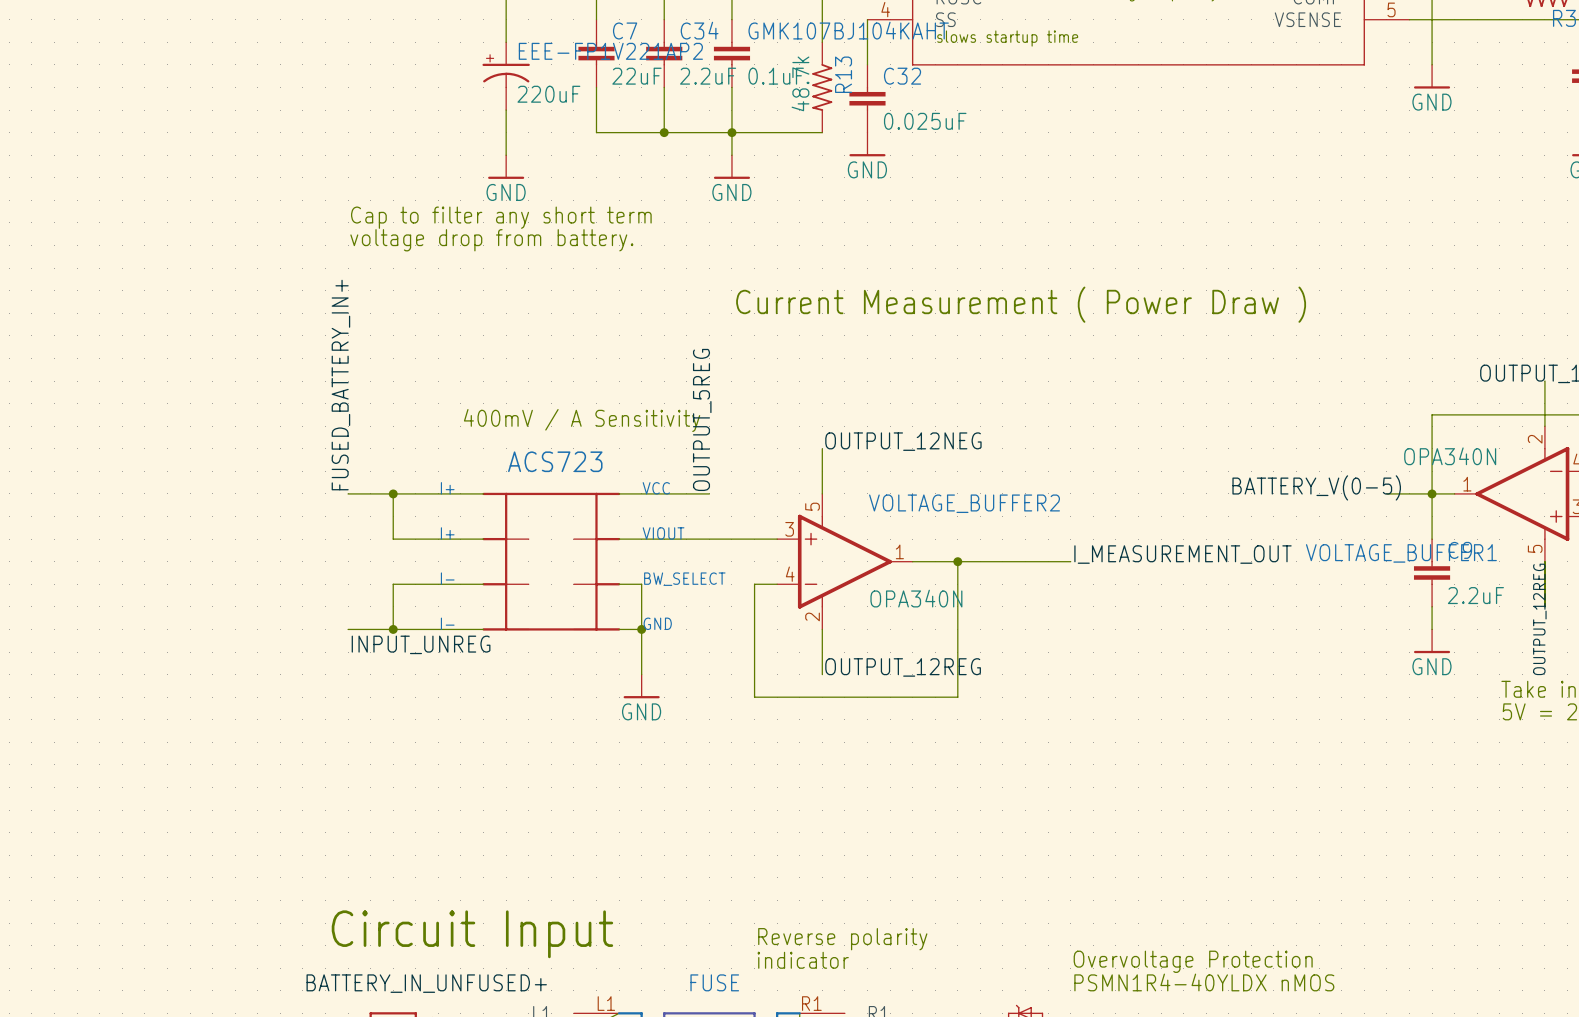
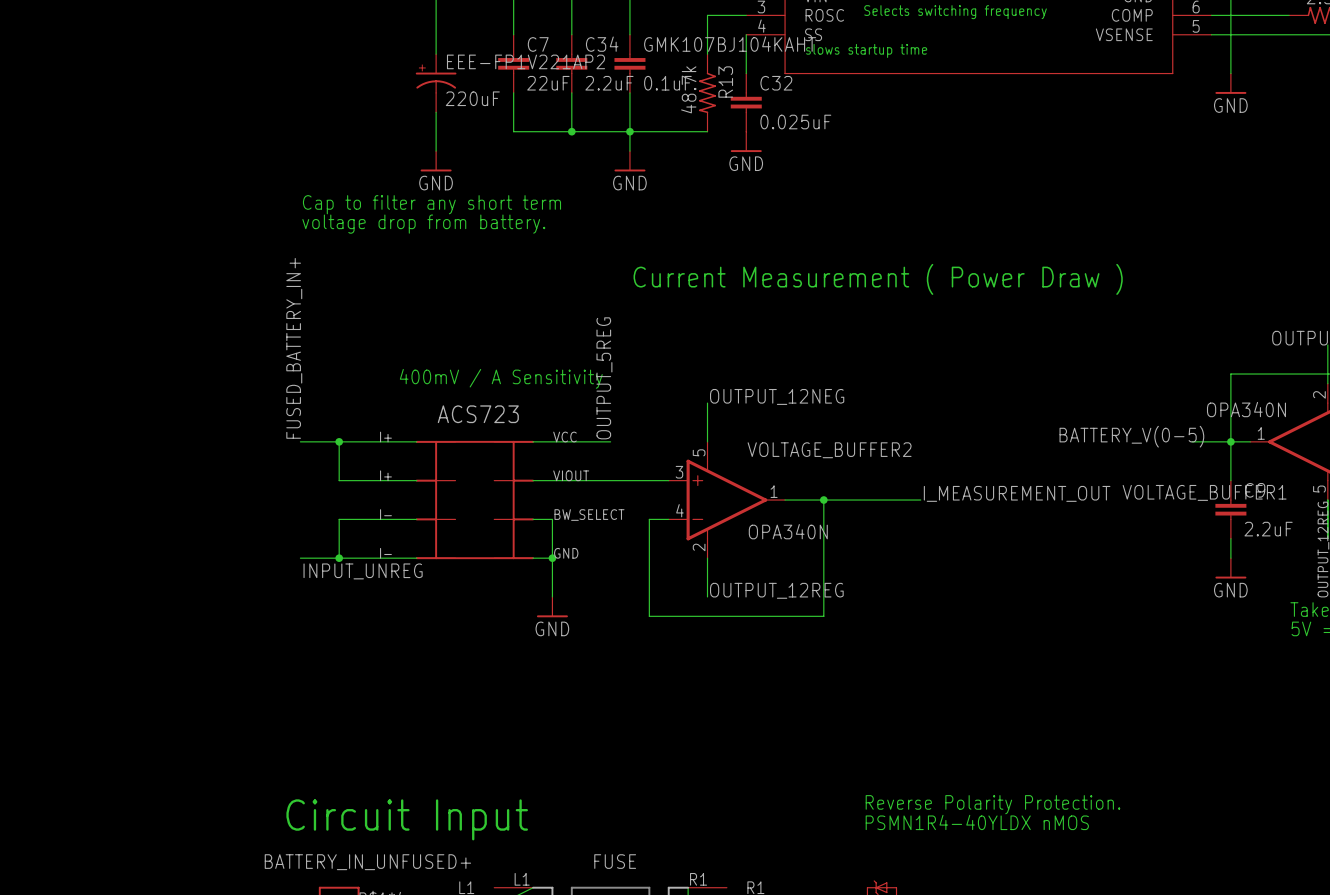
text: none -> Reverse Polarity Protection. (992, 804)
text: Reverse polarity (842, 939) -> none
text: indicator (803, 960) -> none
text: Overvoltage Protection (1193, 961) -> none
text position: PSMN1R4-40YLDX nMOS (1204, 982) -> PSMN1R4-40YLDX nMOS (977, 822)

